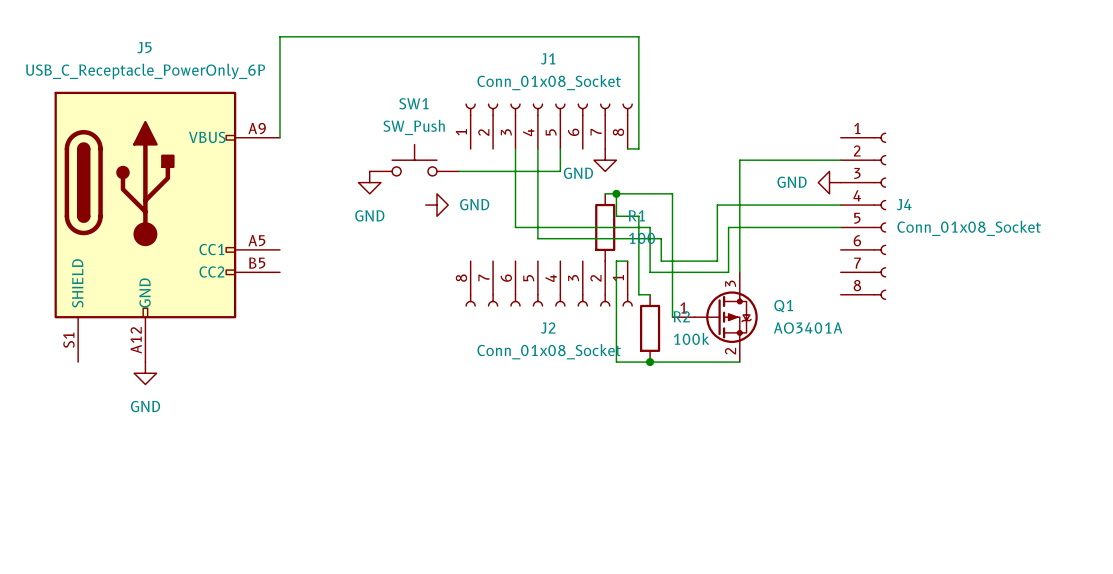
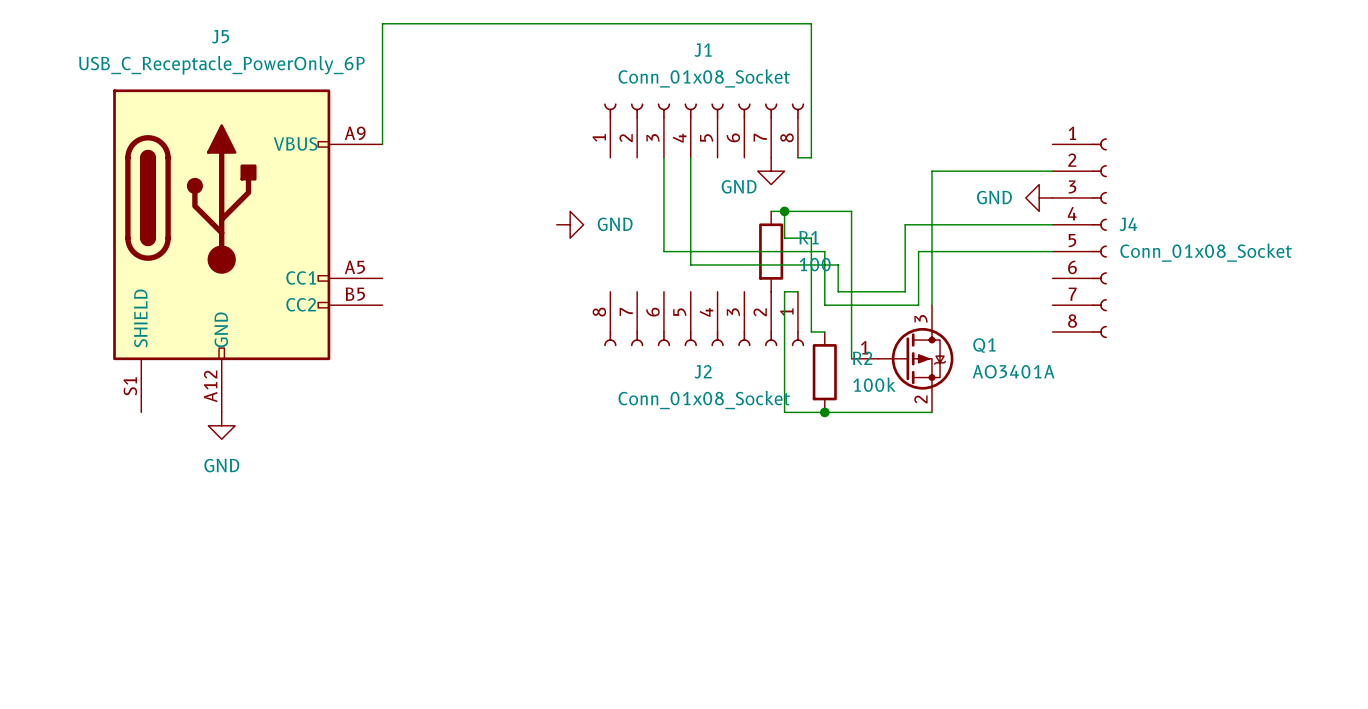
wire: (560, 148) (560, 171) (459, 171) -> none
SW1: SW_Push (414, 160) -> none
power symbol: GND (369, 182) -> none

